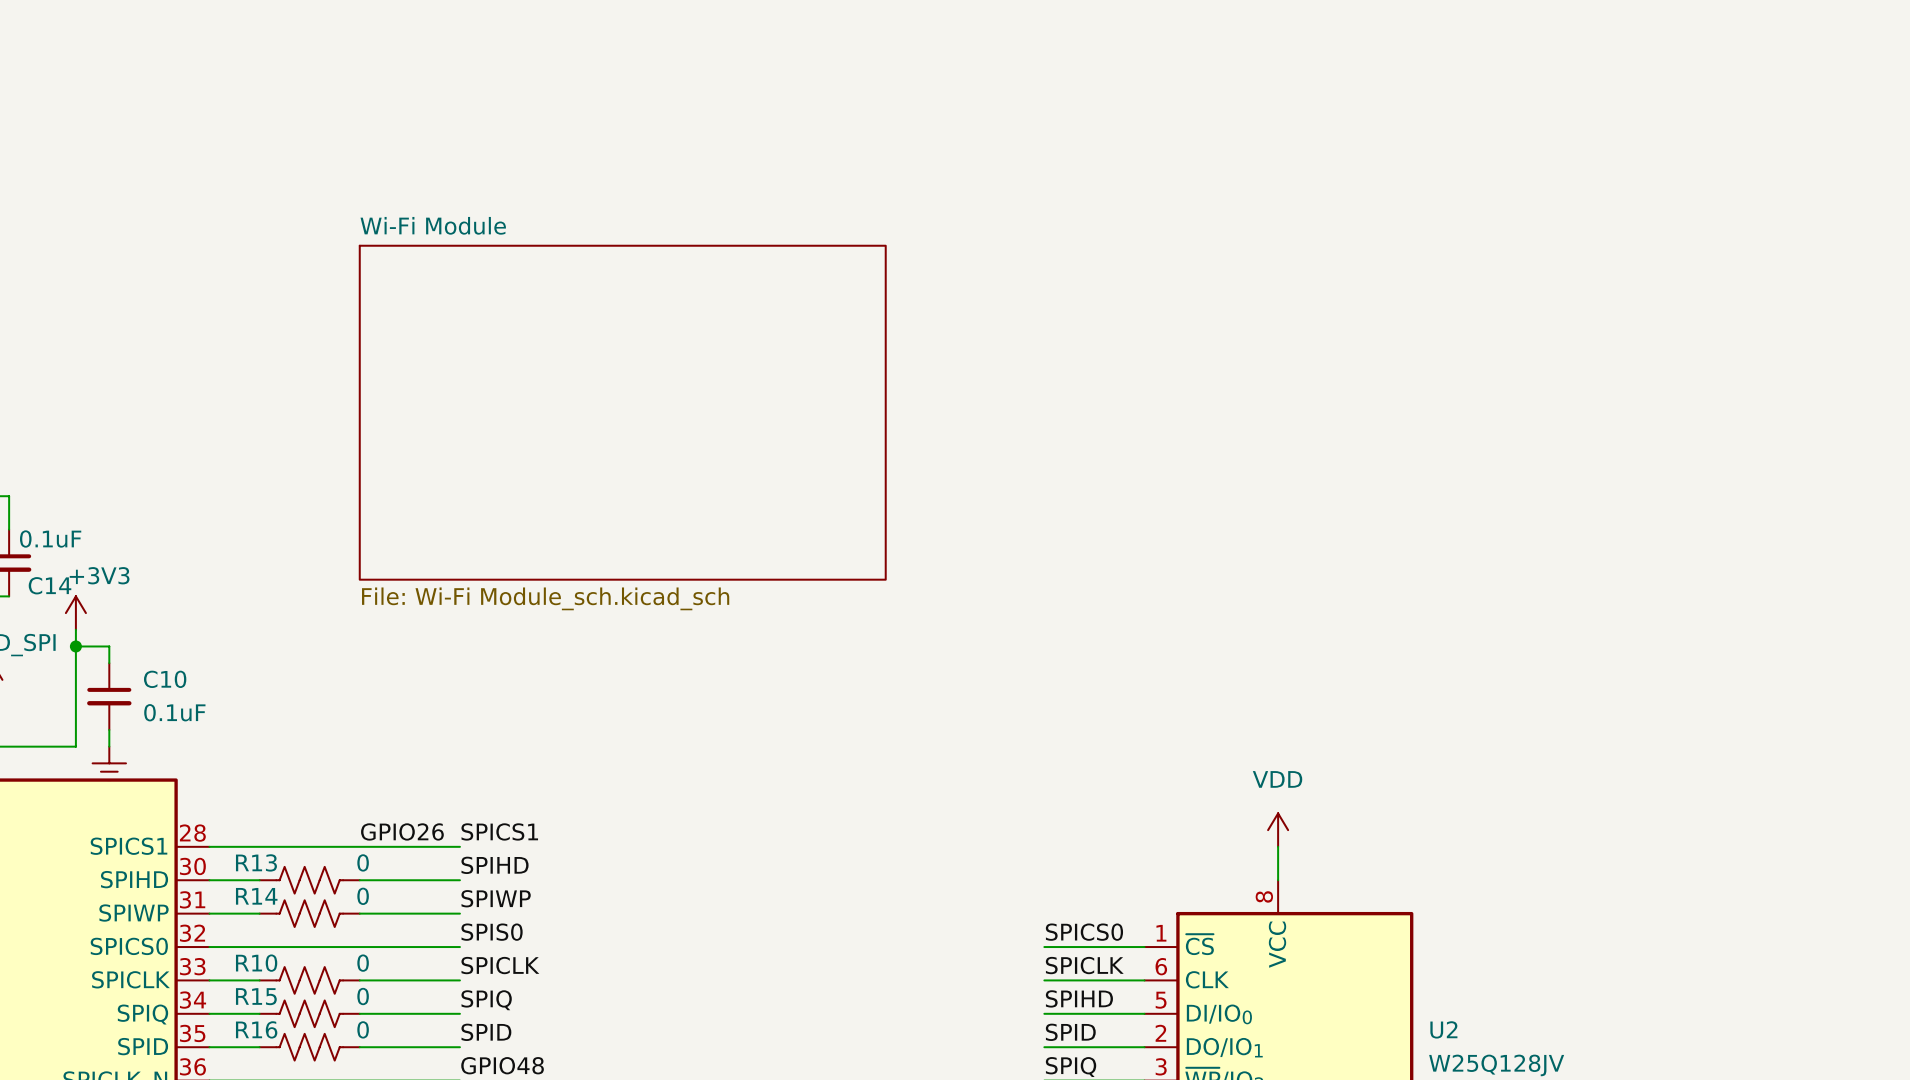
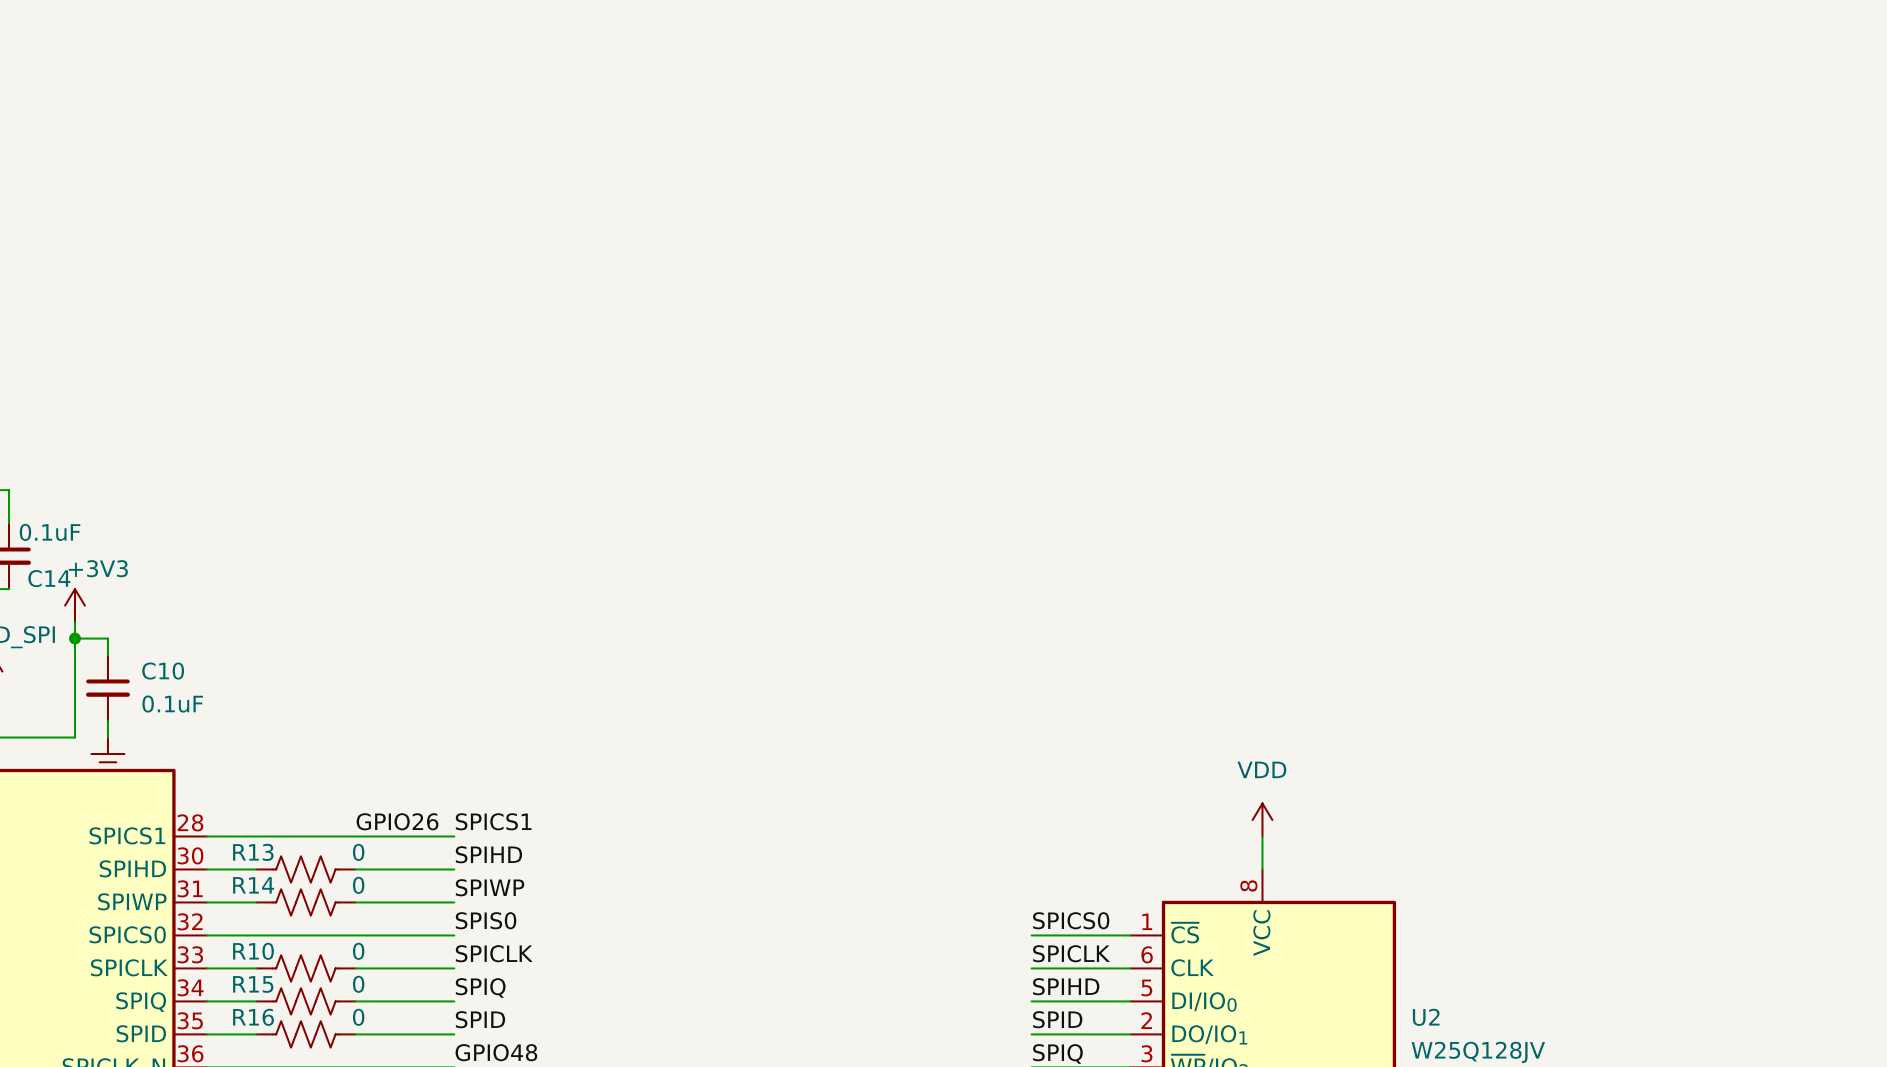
sheet Wi-Fi Module: File: Wi-Fi Module_sch.kicad_sch (622, 412) -> none

